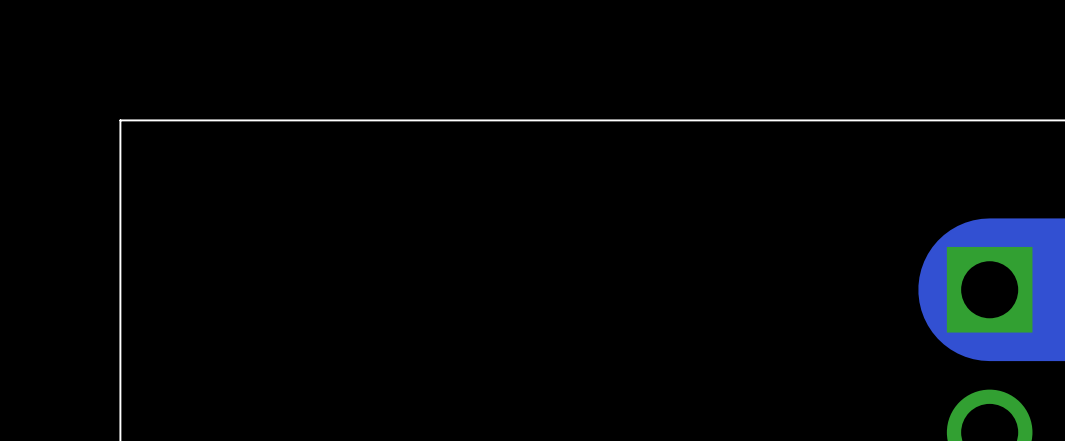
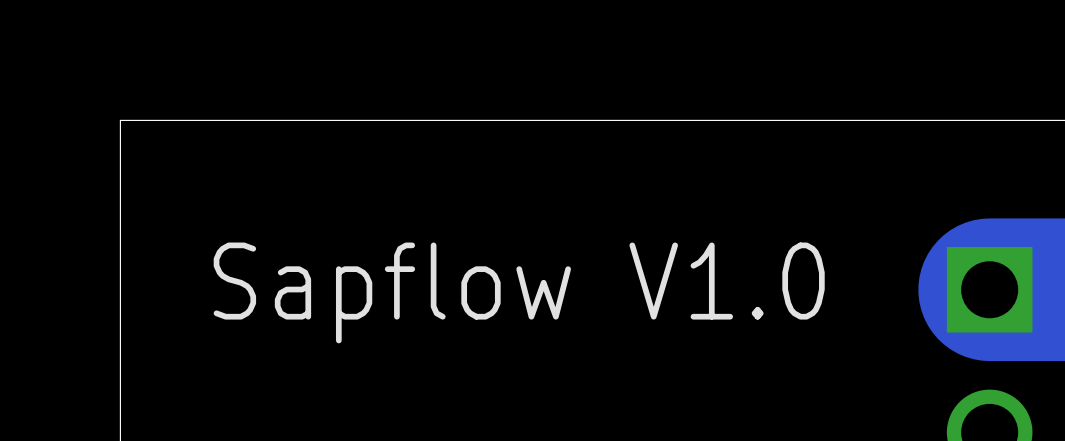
text: none -> Sapflow V1.0 (519, 292)

